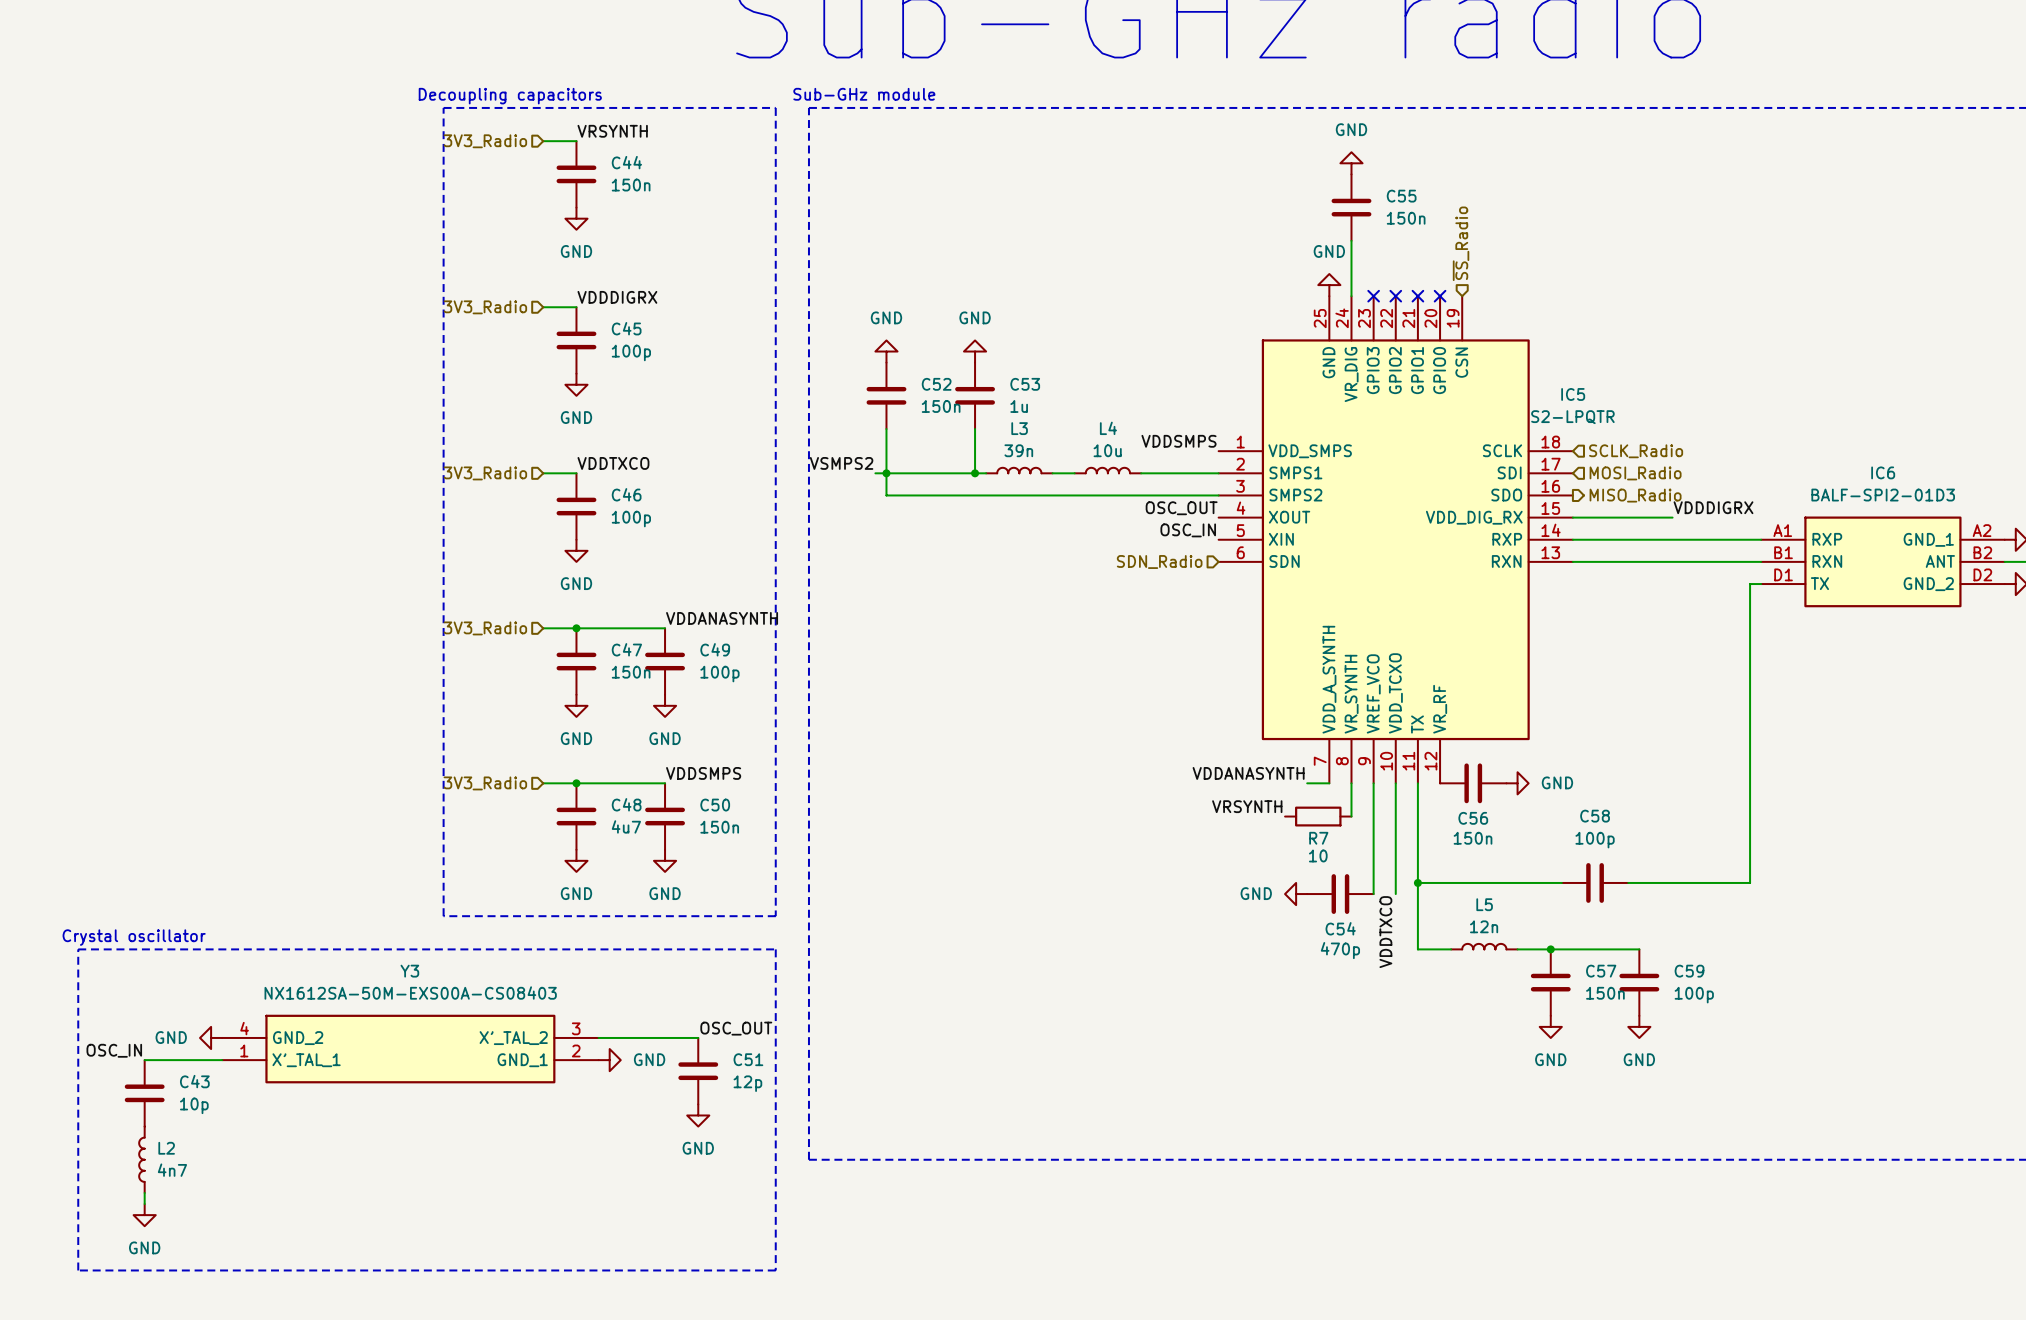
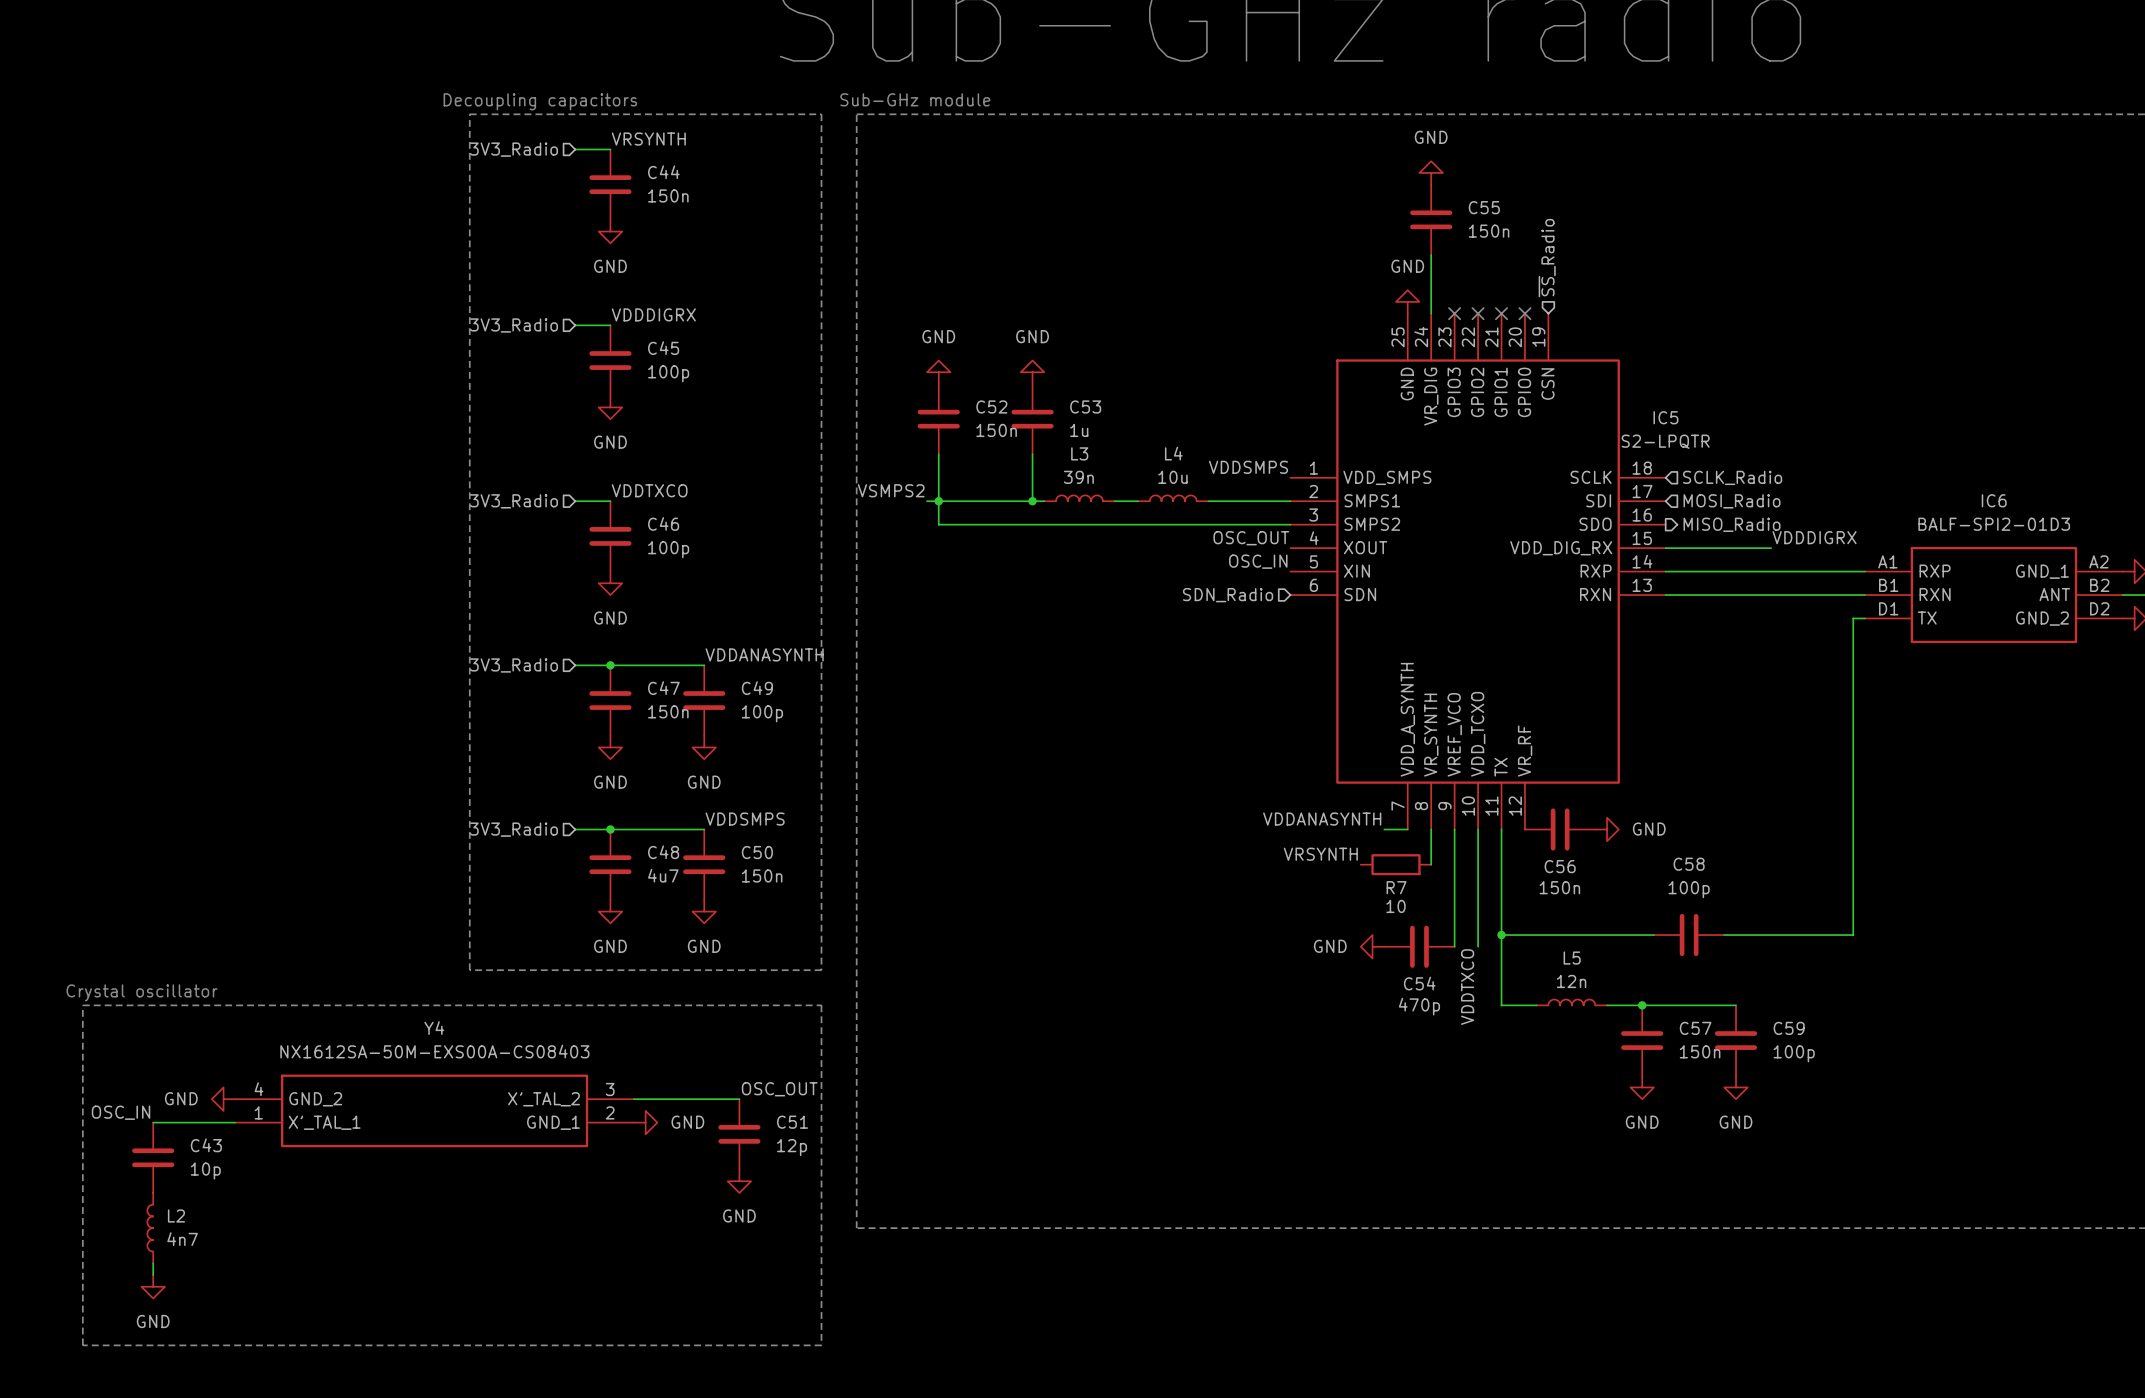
Y3 name: Y3 (409, 971) -> Y4 (434, 1028)

